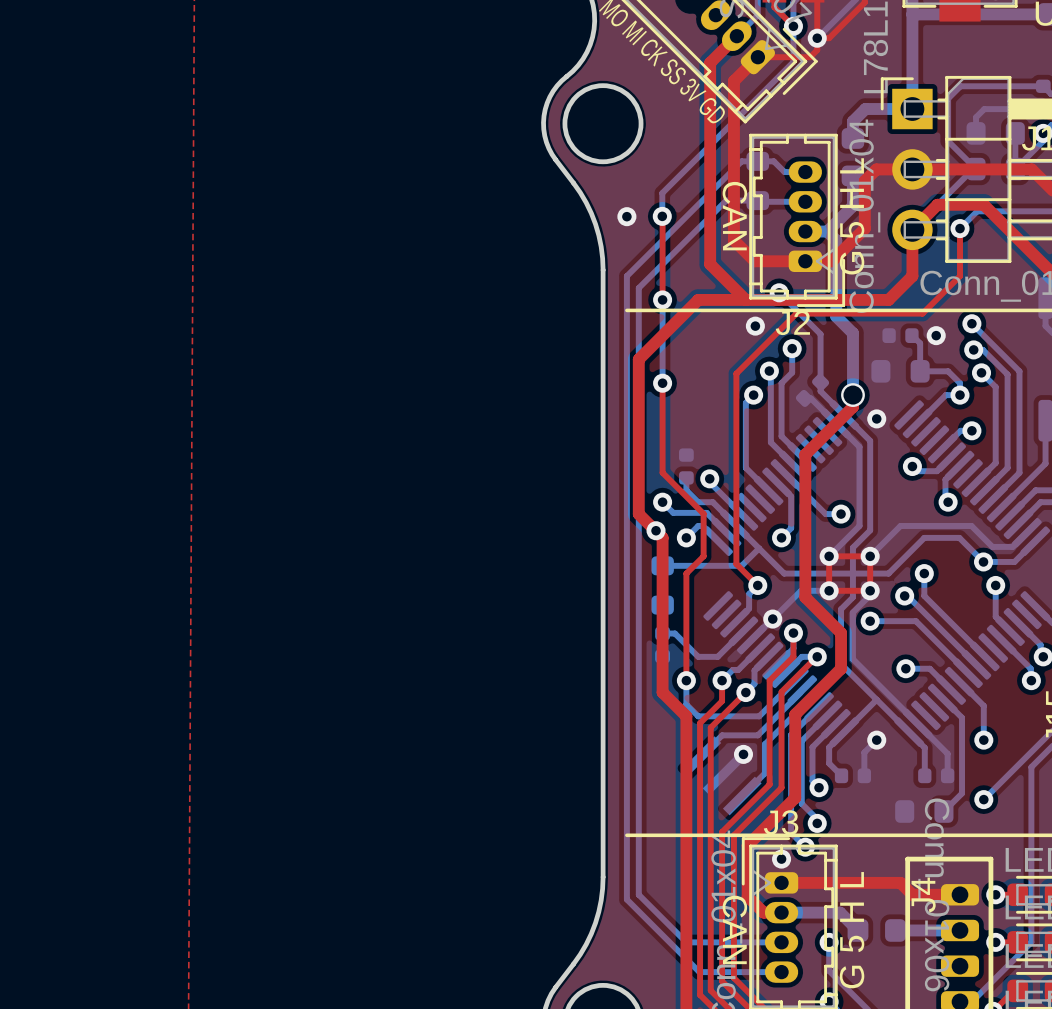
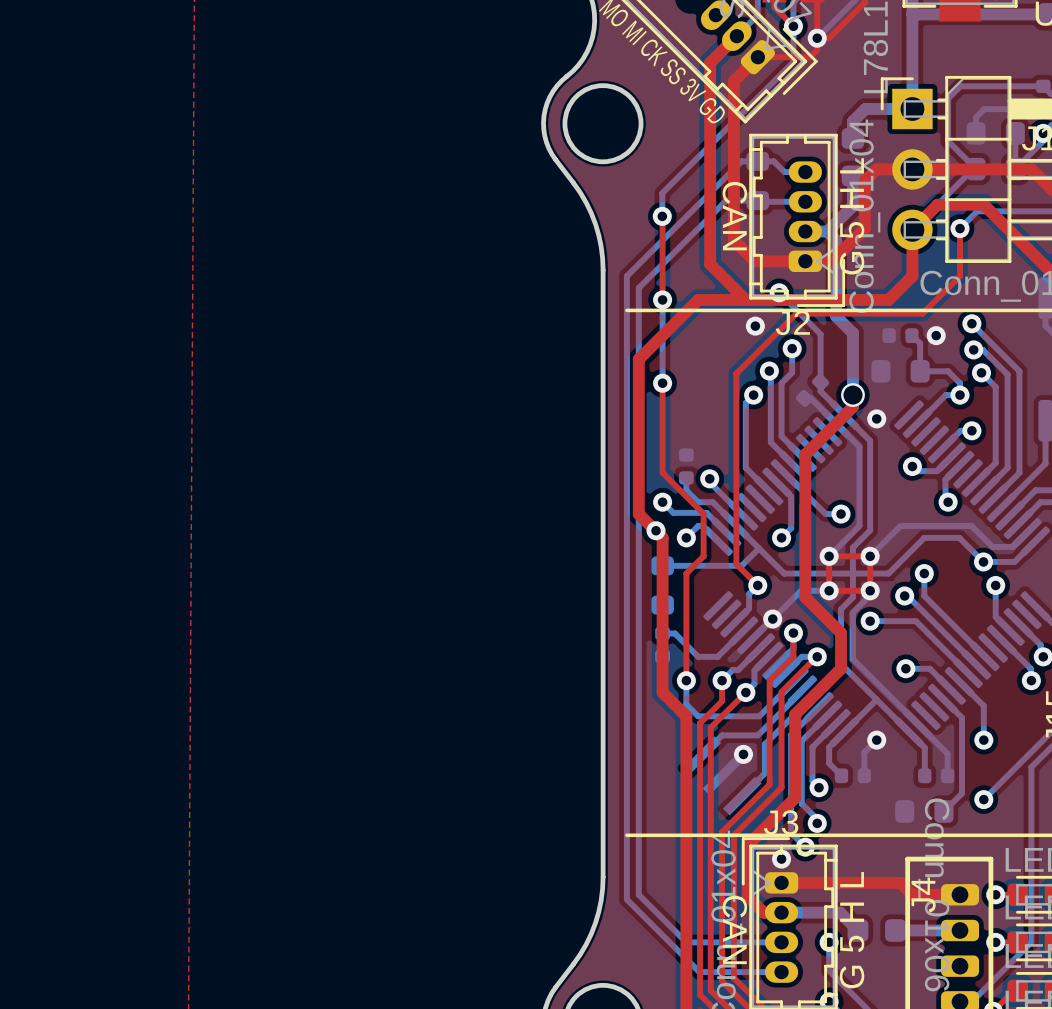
via: (626, 216) -> none

